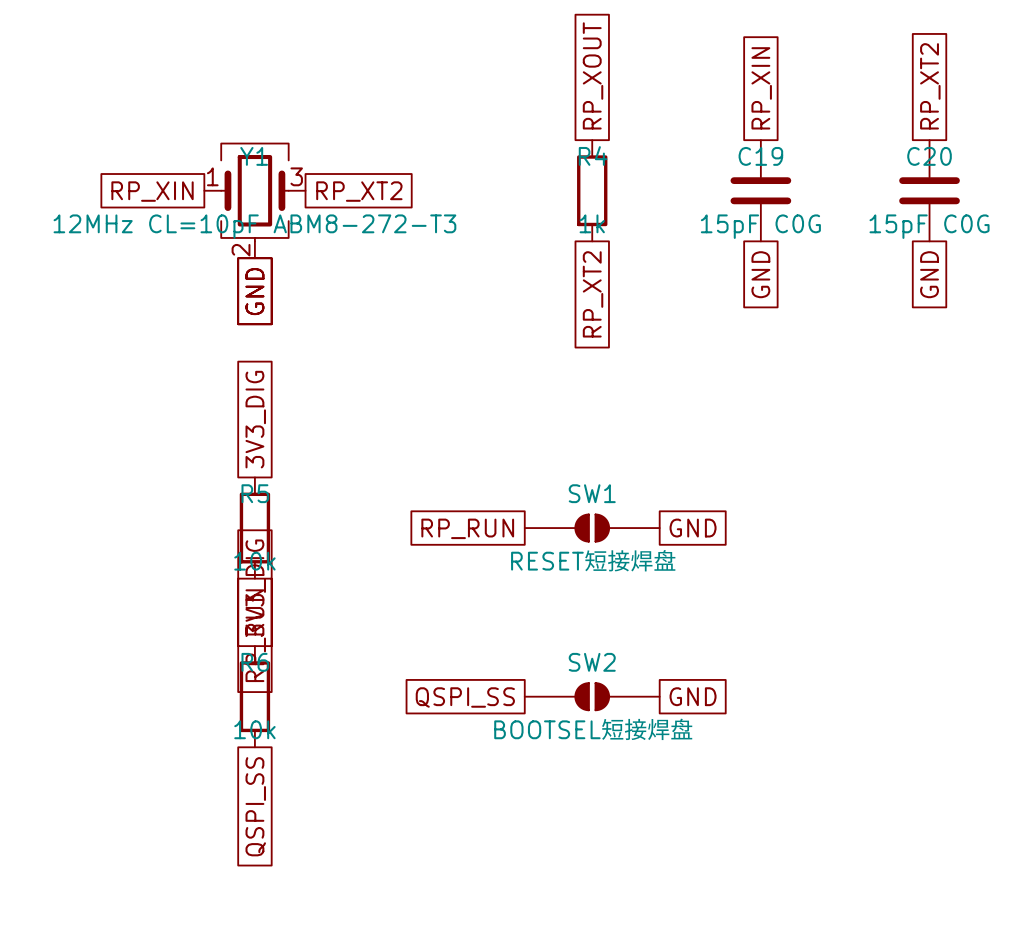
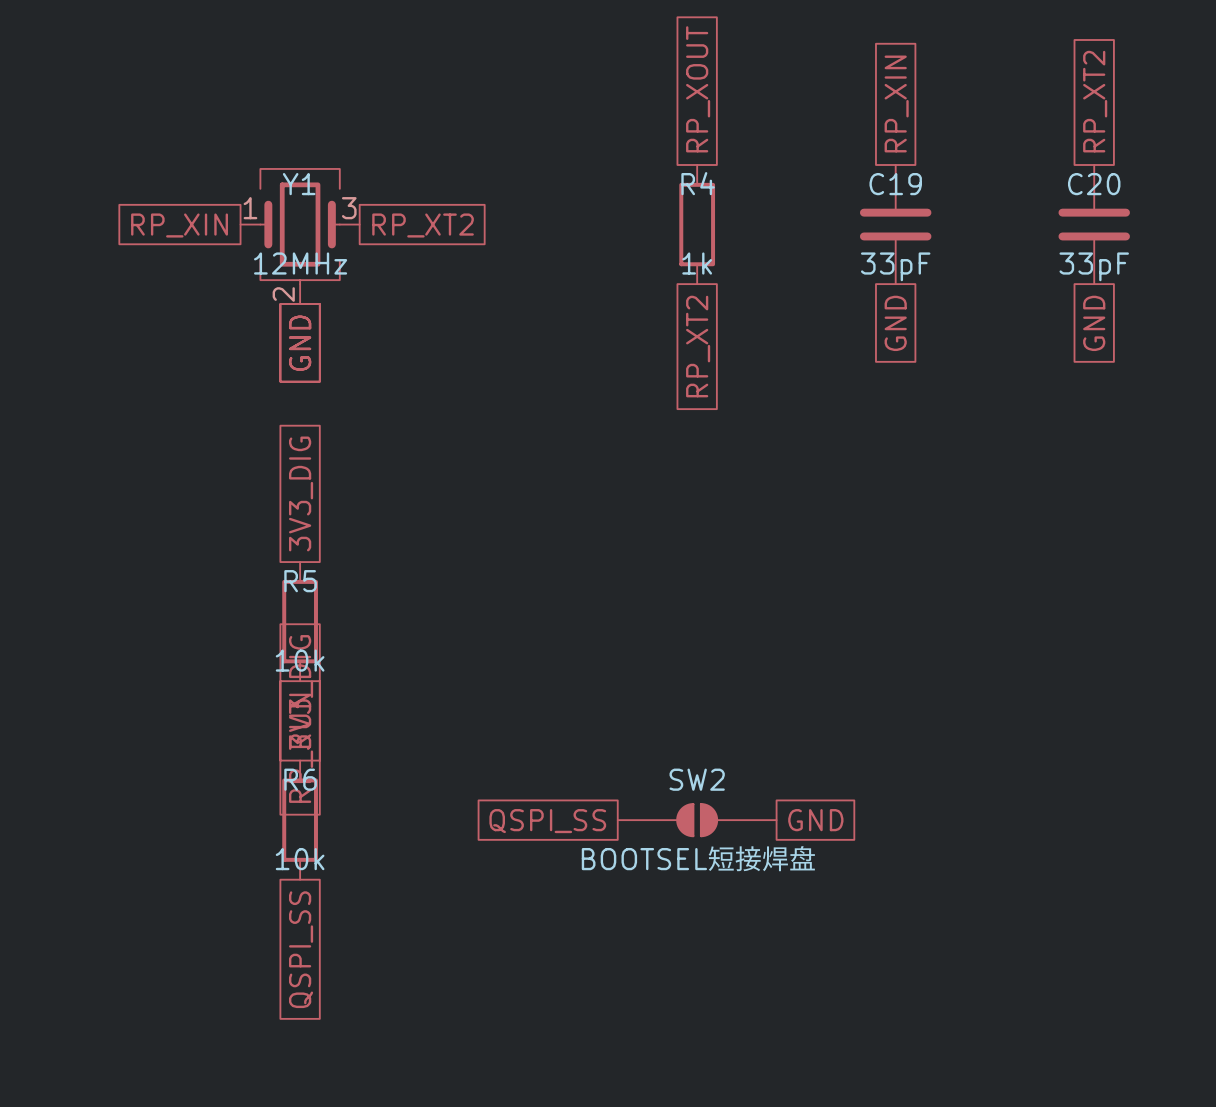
Y1 value: 12MHz CL=10pF ABM8-272-T3 (254, 226) -> 12MHz (300, 263)
C19 value: 15pF C0G (760, 226) -> 33pF (895, 266)
C20 value: 15pF C0G (929, 226) -> 33pF (1094, 266)
global label: RP_RUN (467, 528) -> none
SW1: RESET短接焊盘 (592, 528) -> none
global label: GND (693, 528) -> none

